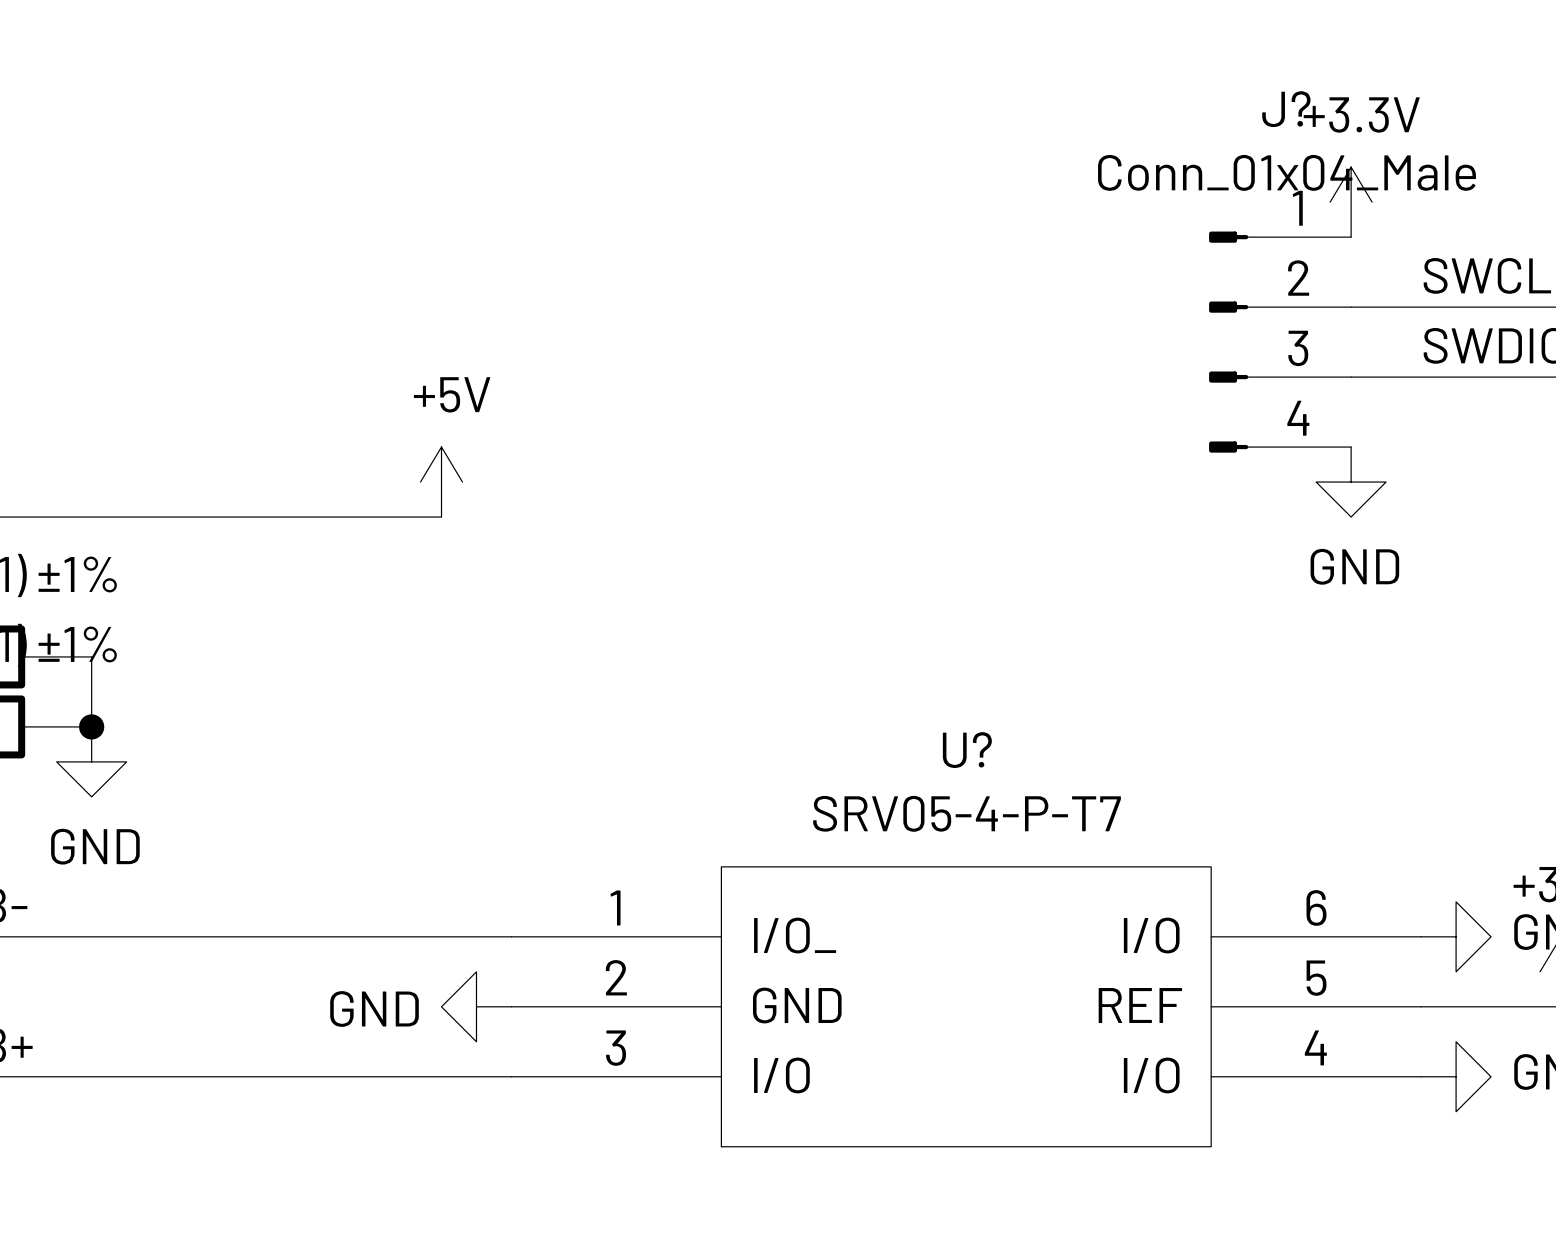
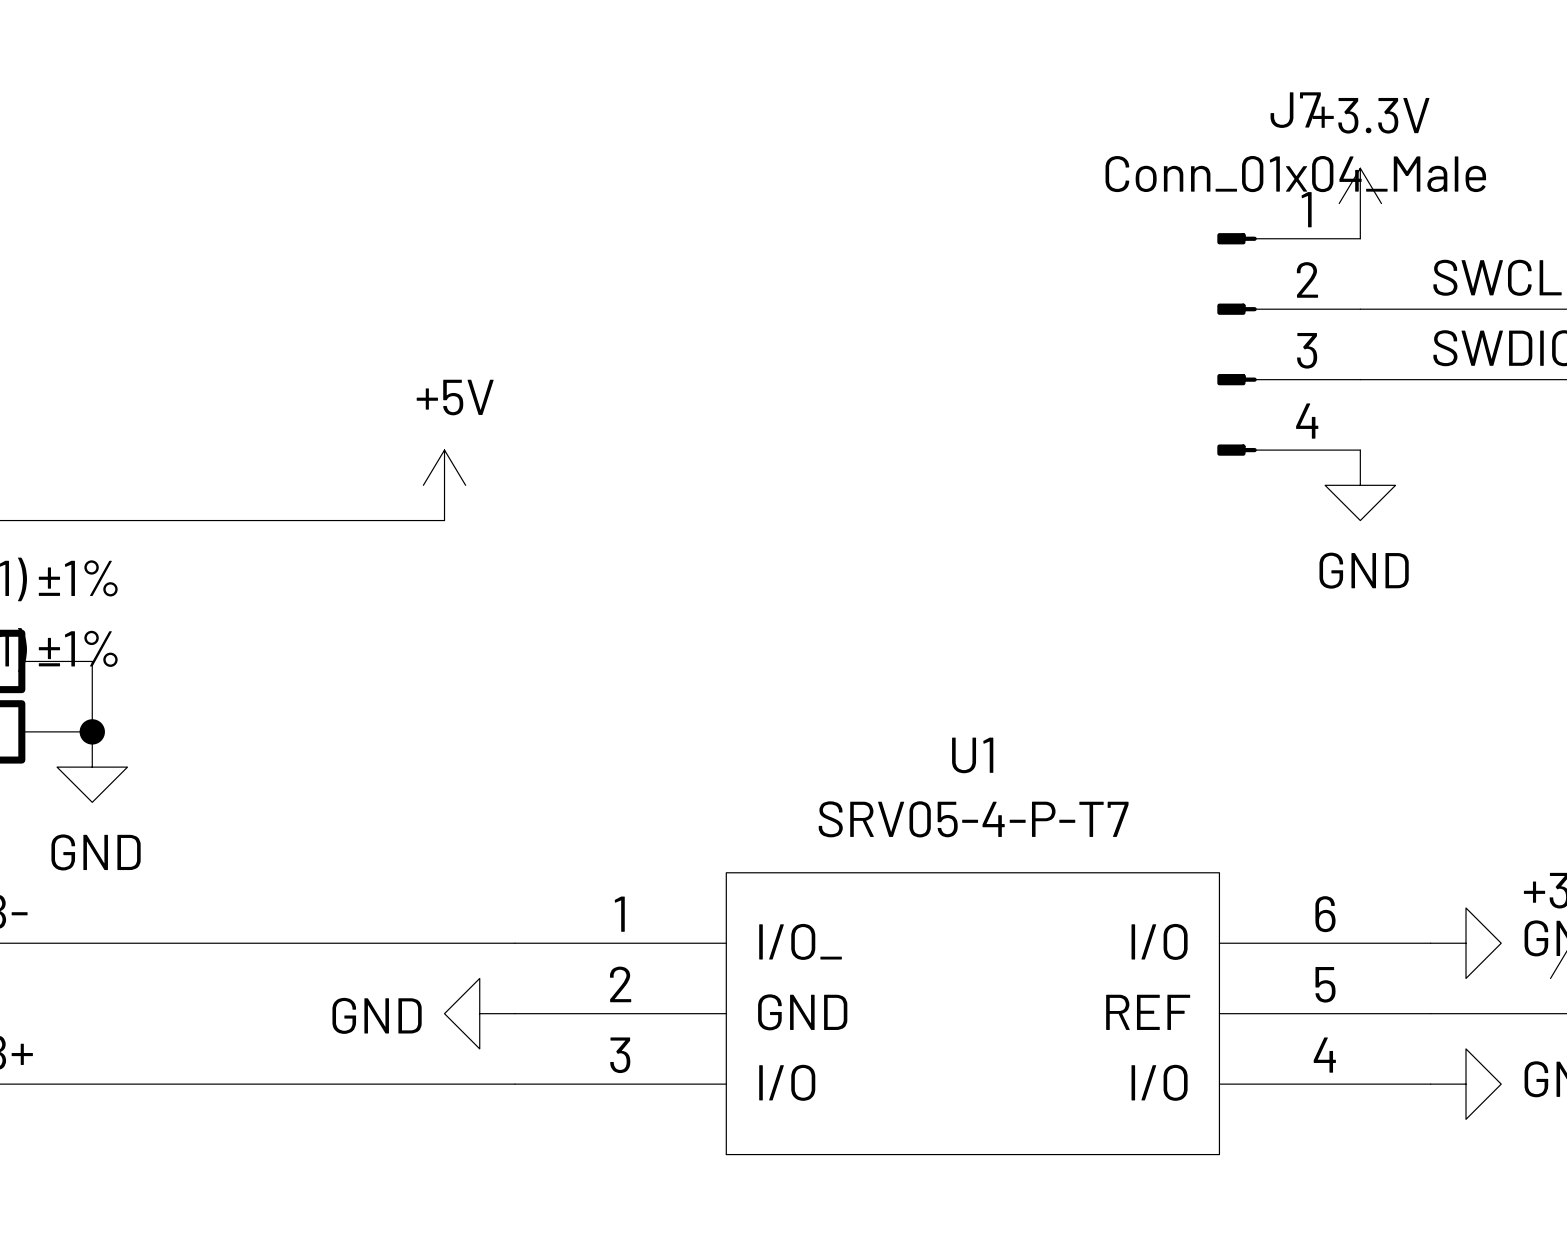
J? name: J? (1286, 109) -> J7 (1295, 110)
U? name: U? (967, 750) -> U1 (972, 755)

